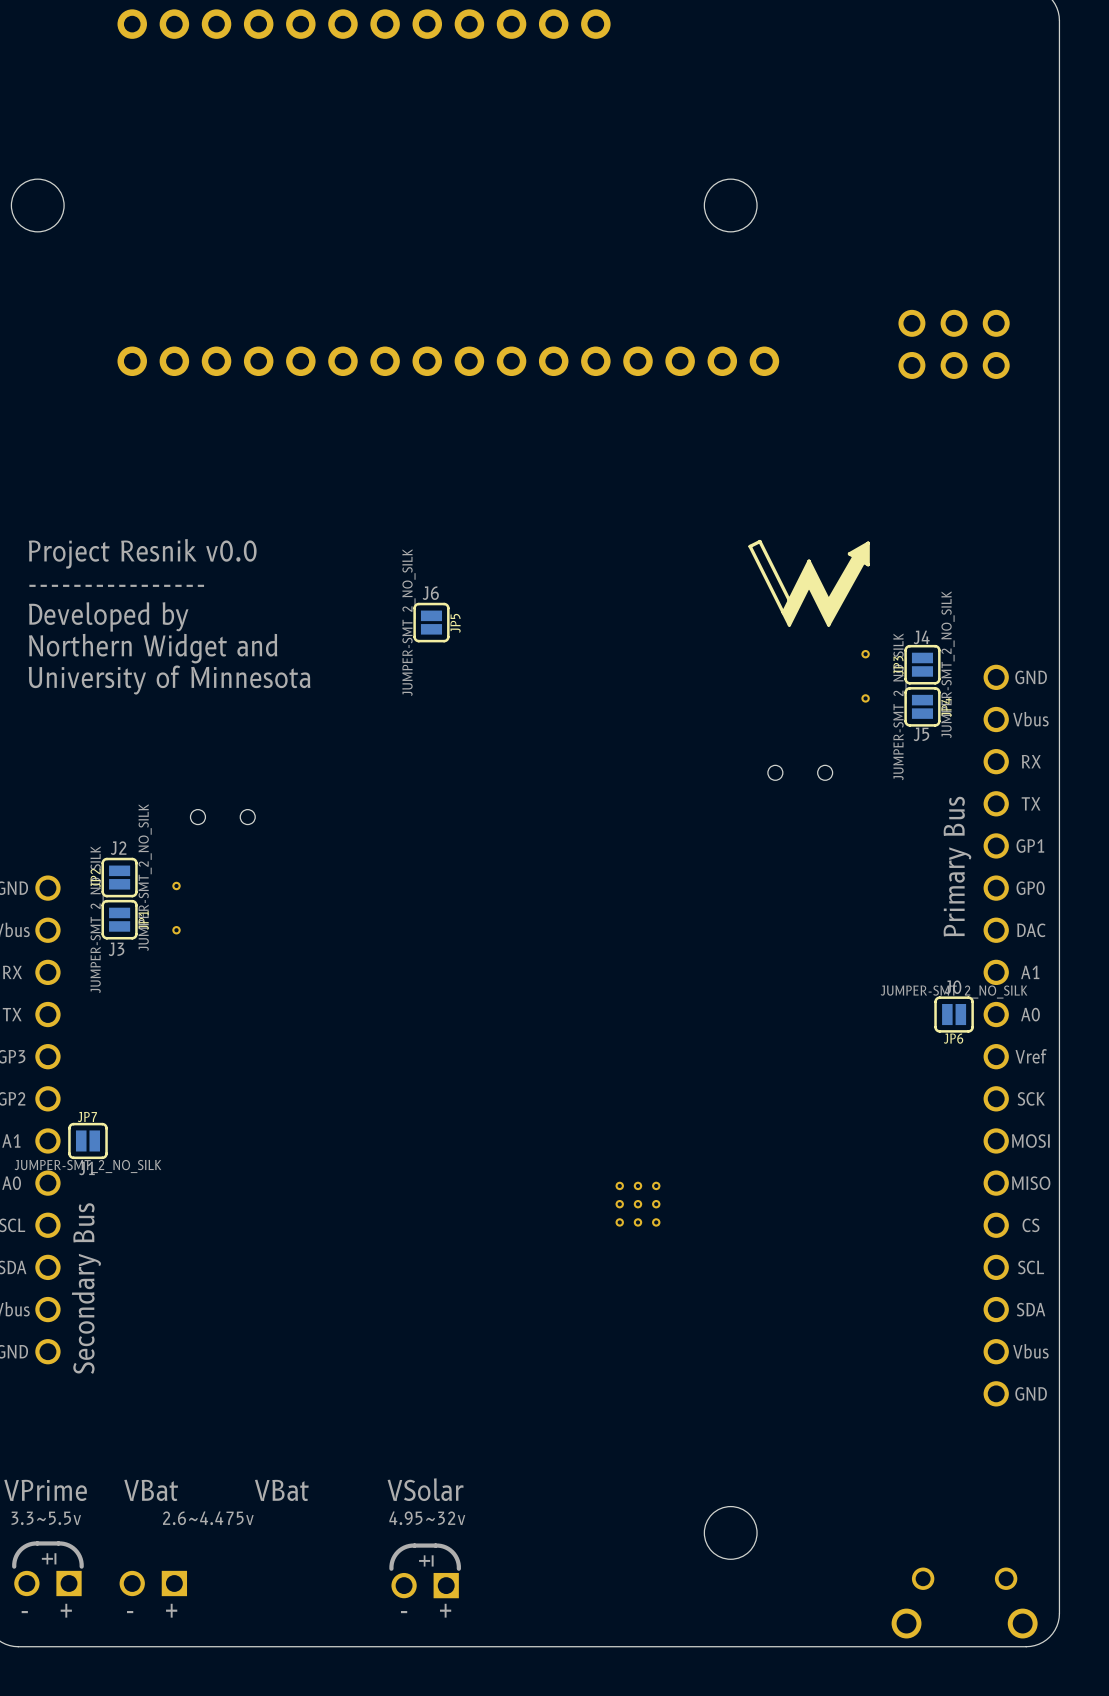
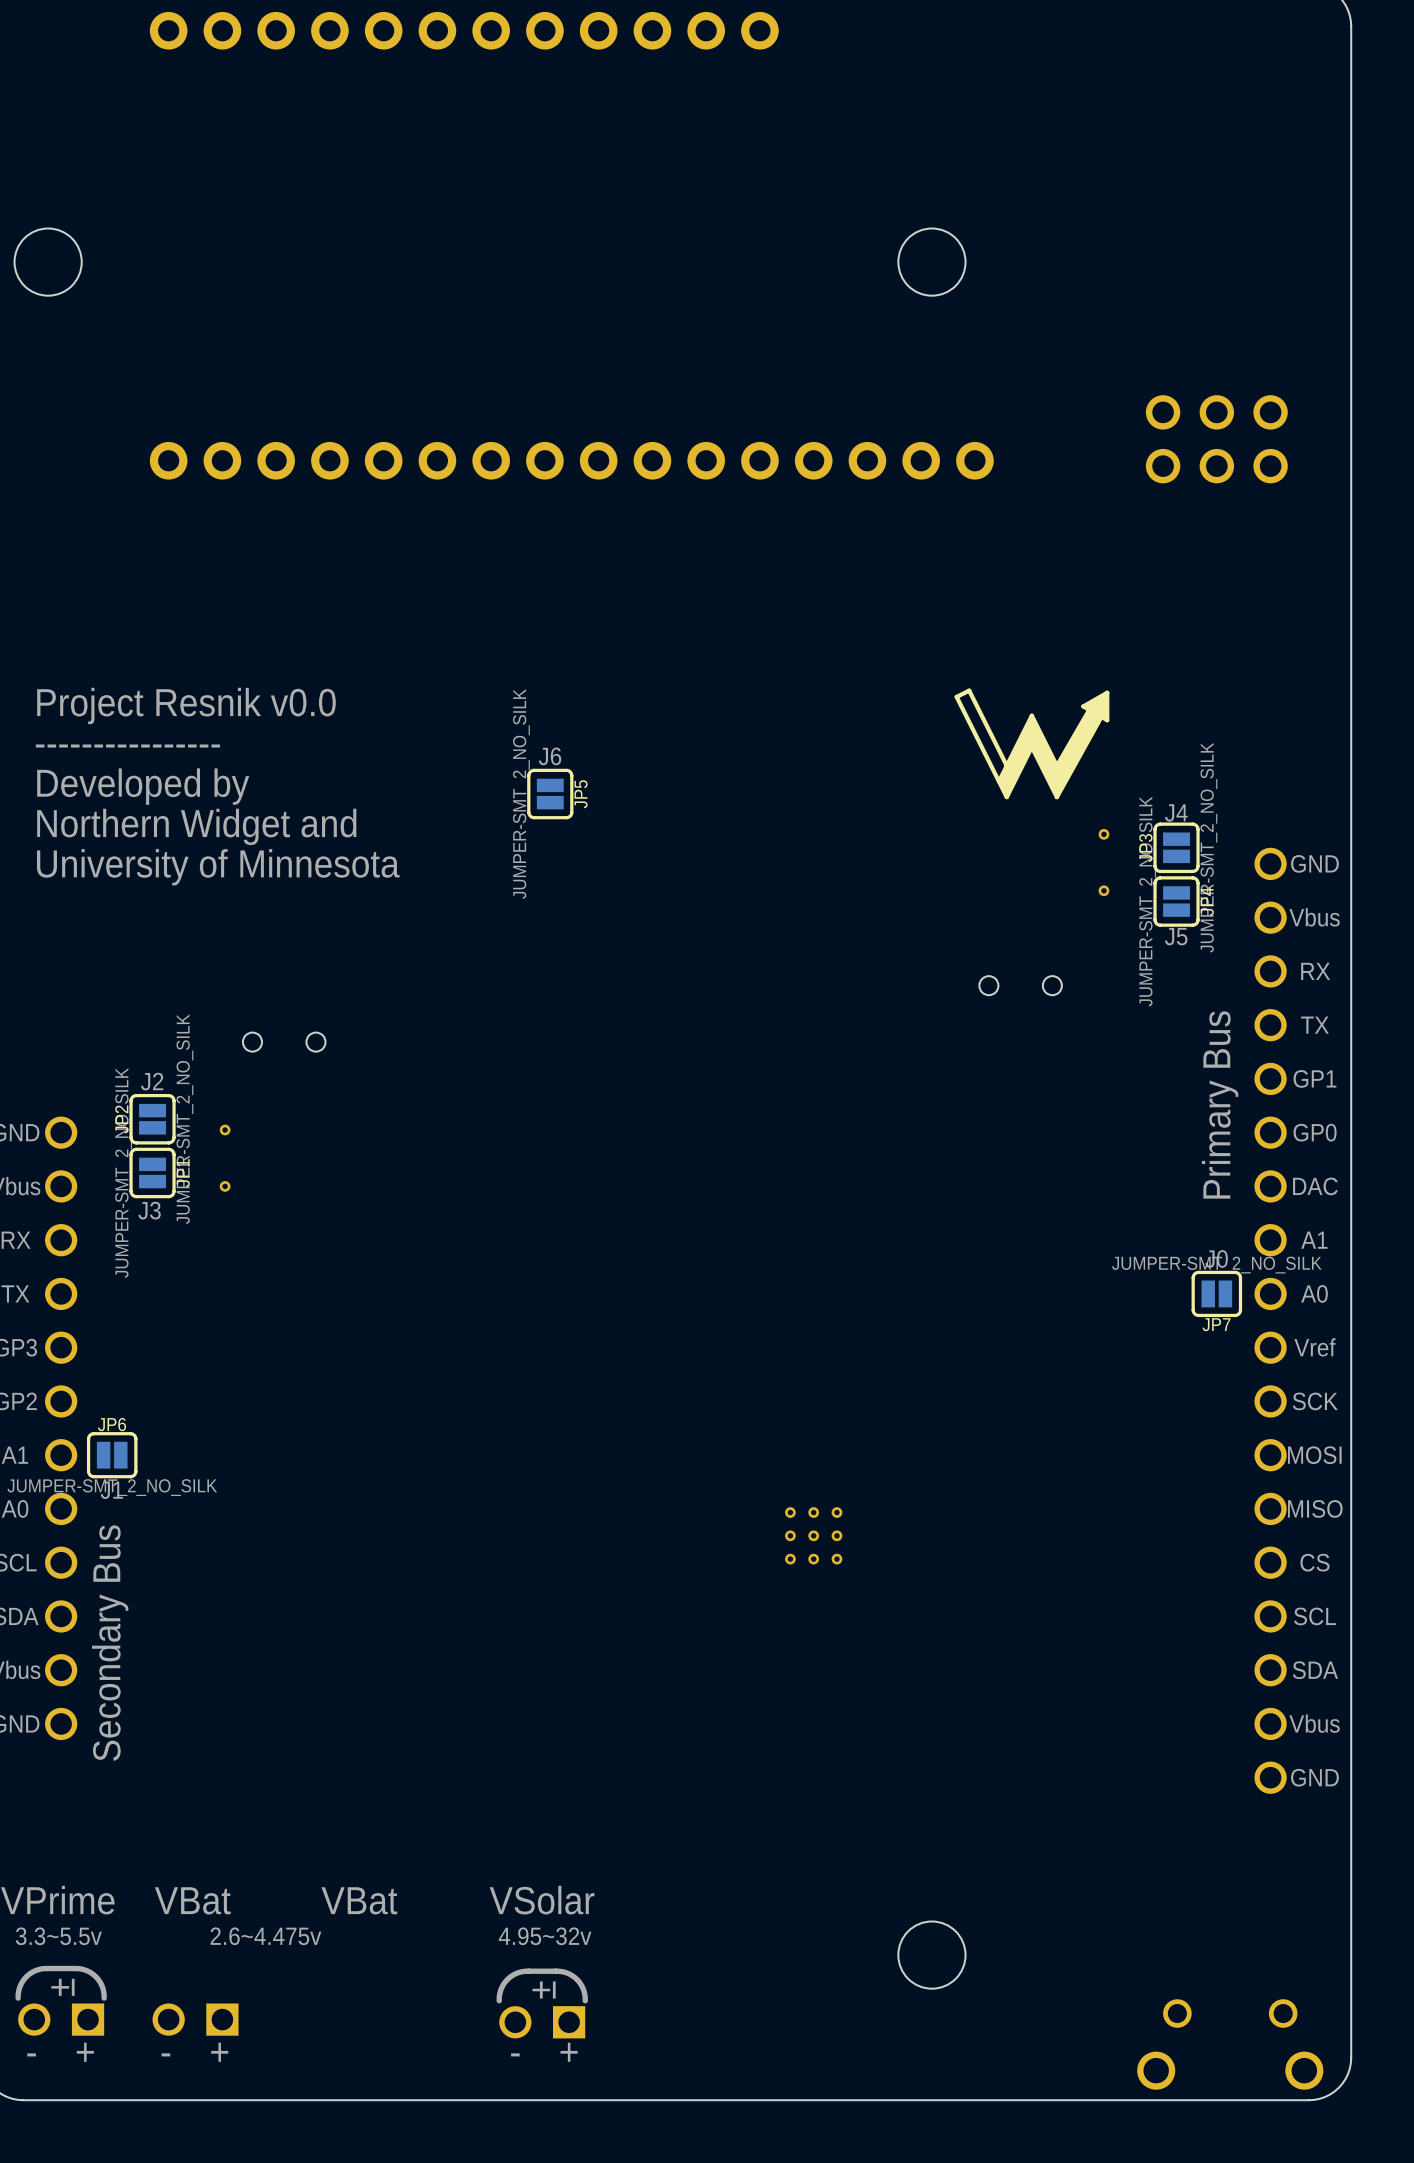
JP6 name: JP6 (953, 1038) -> JP7 (1216, 1324)
JP7 name: JP7 (87, 1117) -> JP6 (111, 1424)

